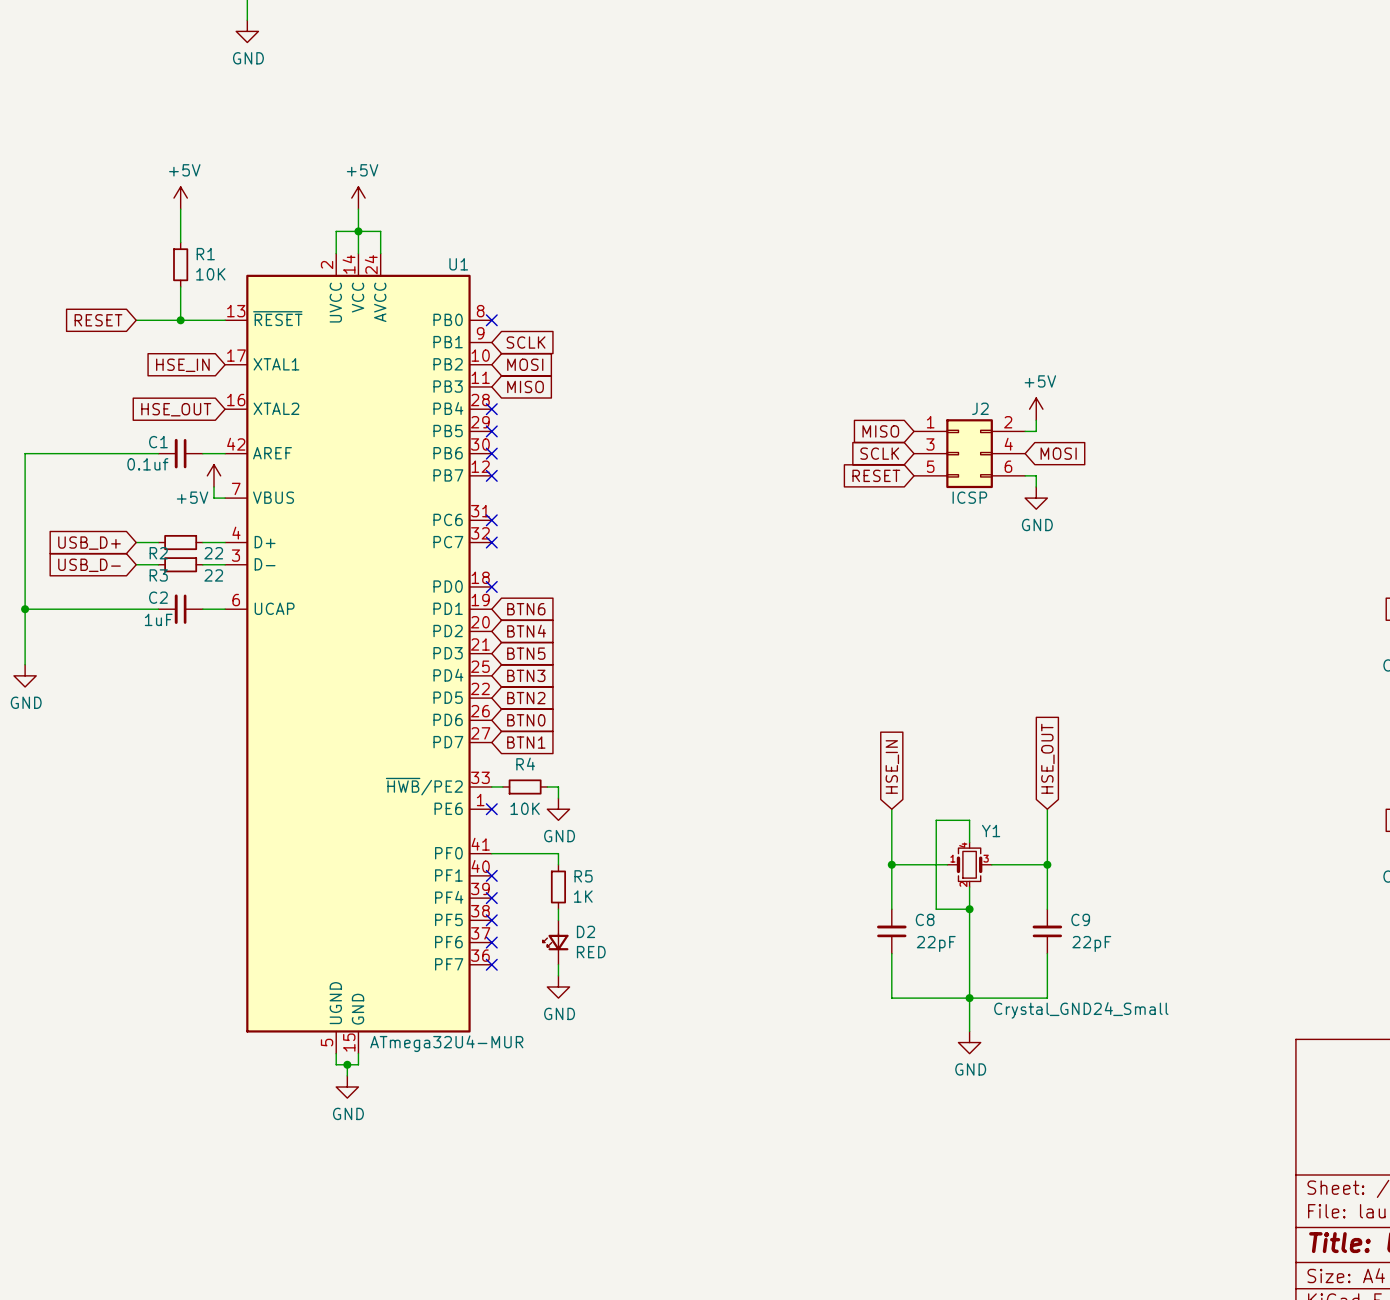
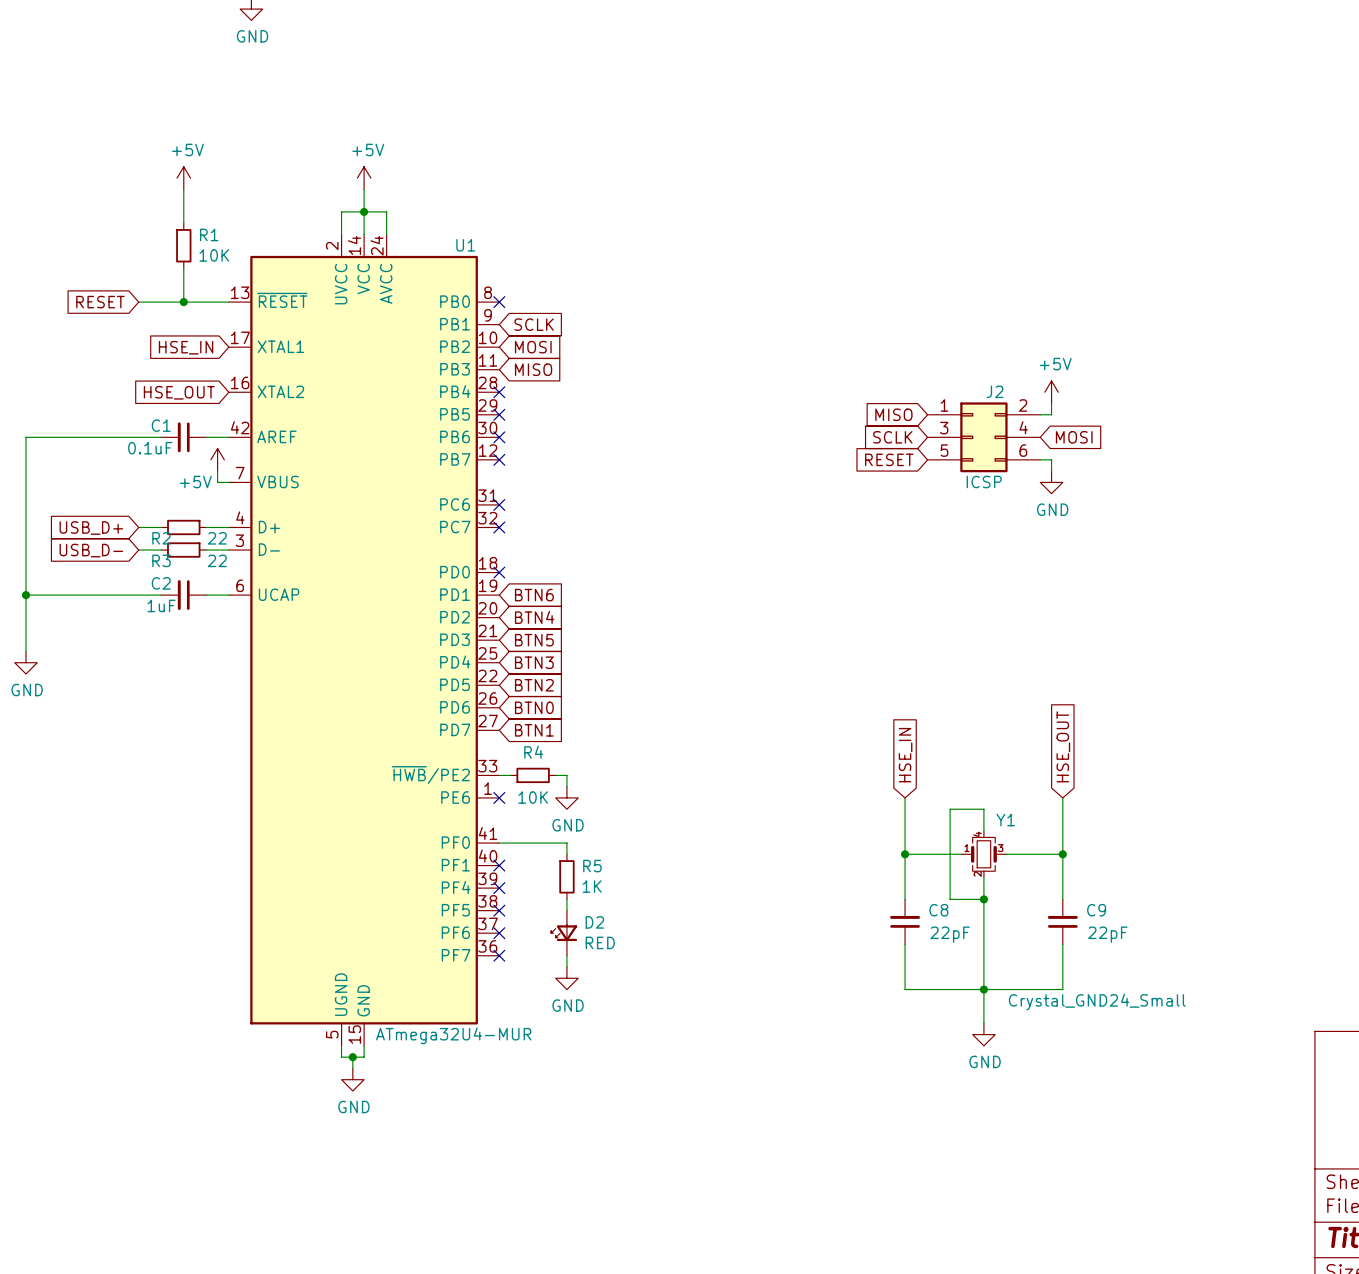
C1 value: 0.1uf (147, 464) -> 0.1uF (150, 448)

